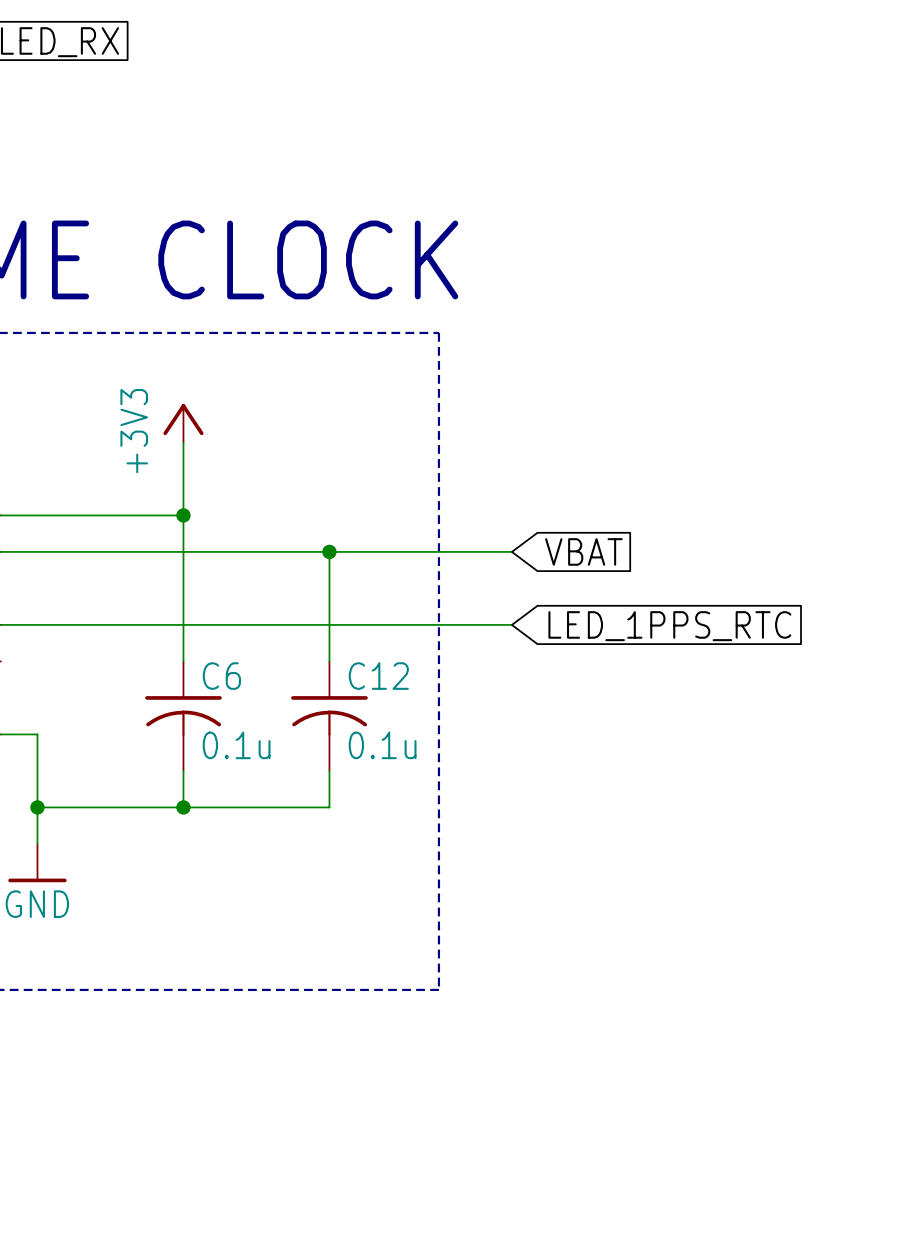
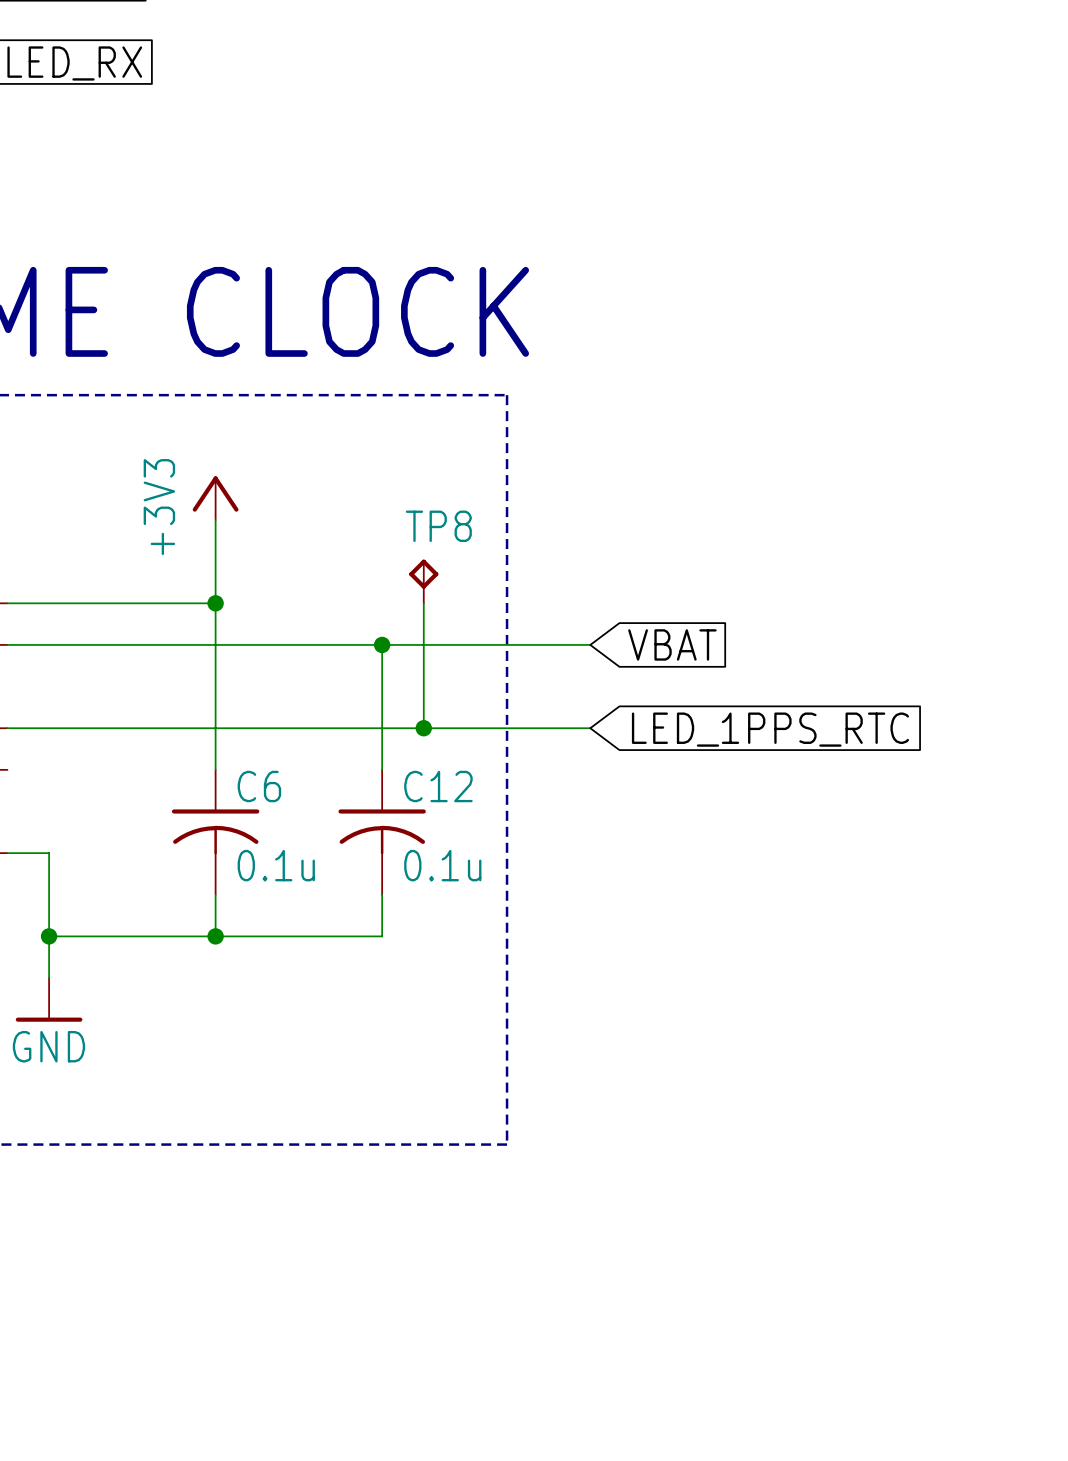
TP8: none -> (423, 581)
wire: none -> (423, 603) (423, 728)
junction: none -> (423, 728)

